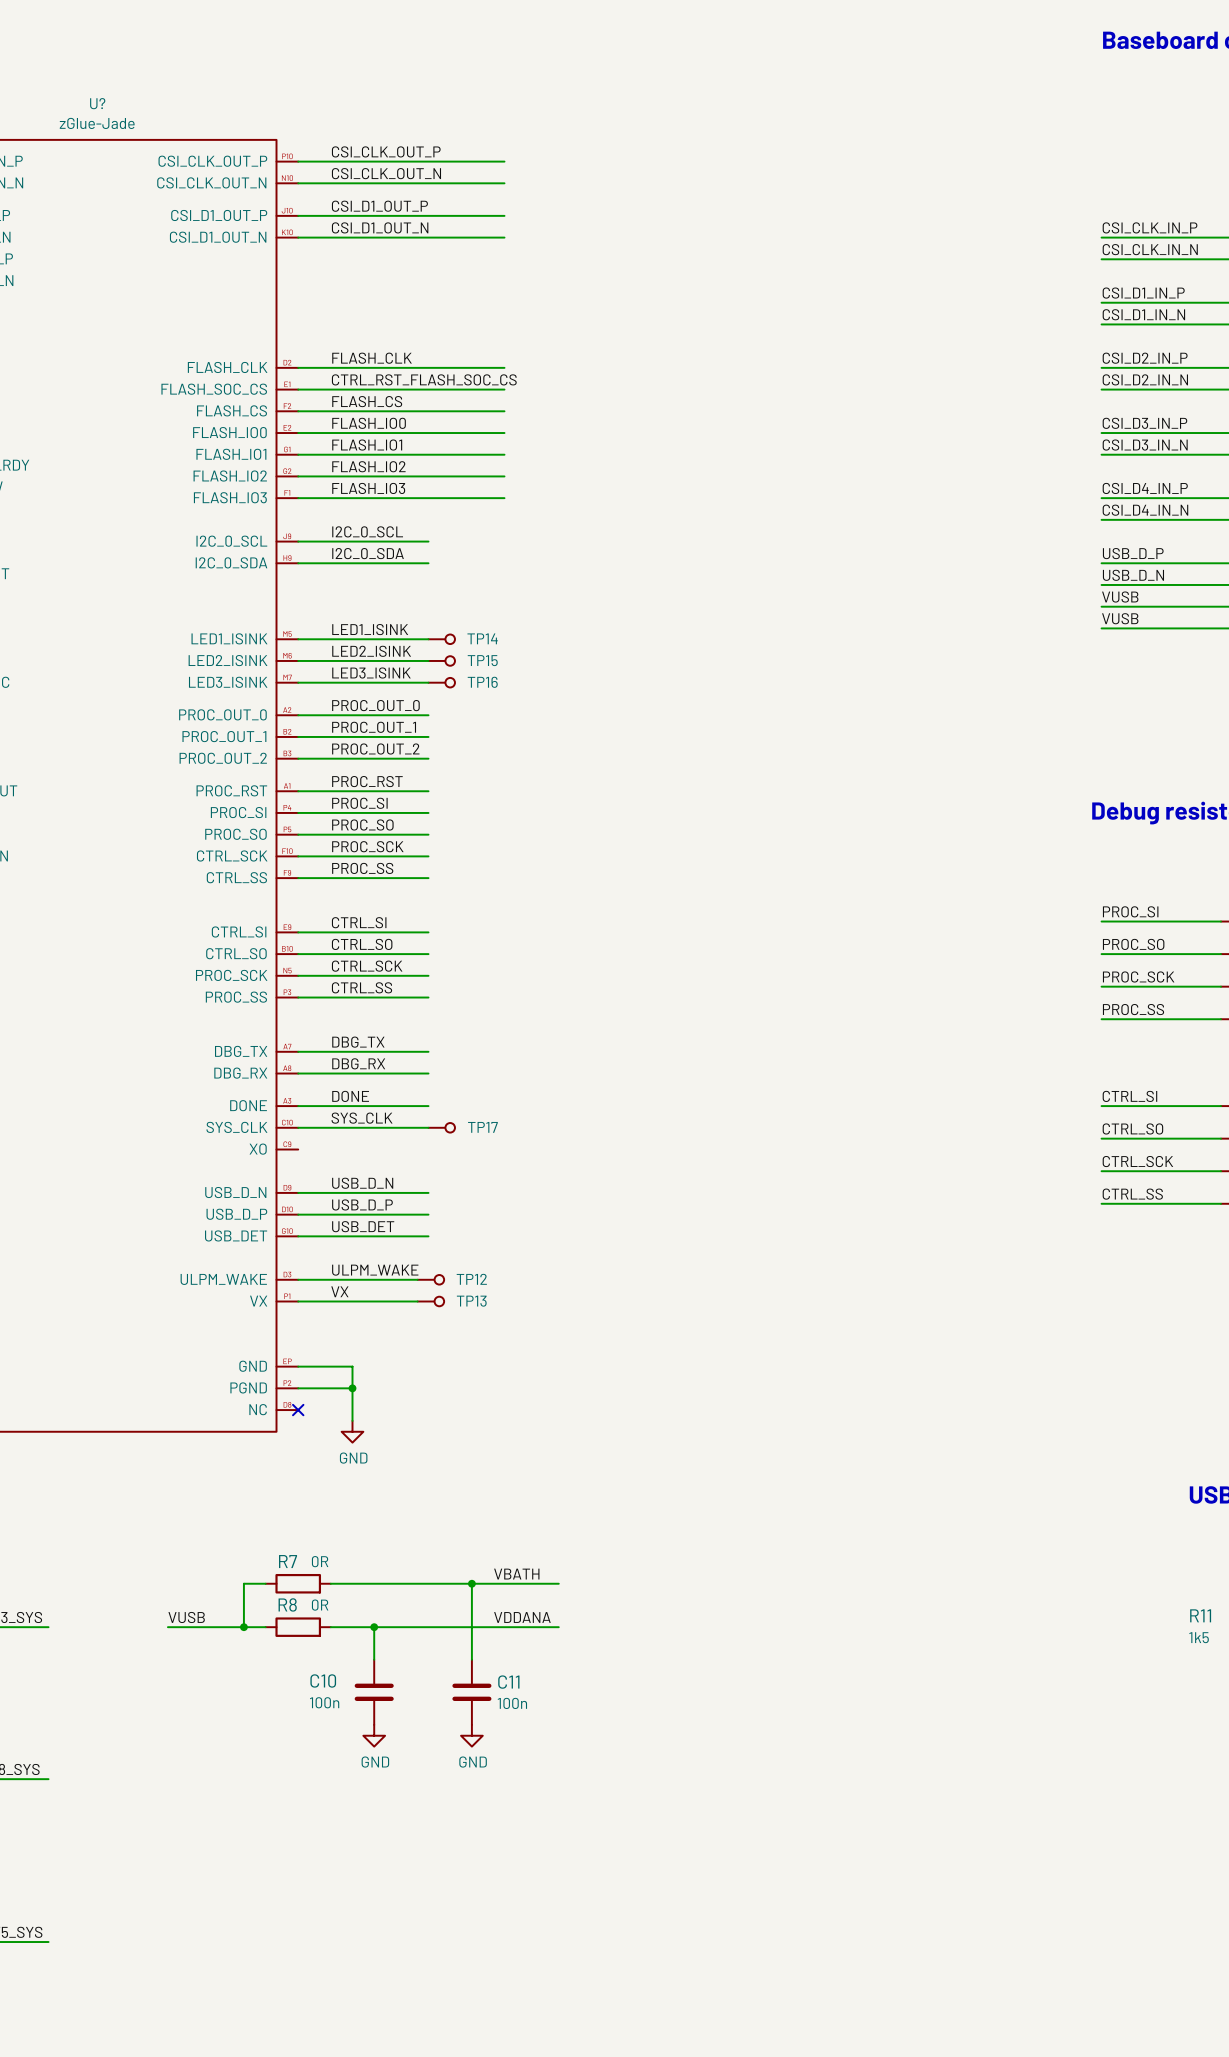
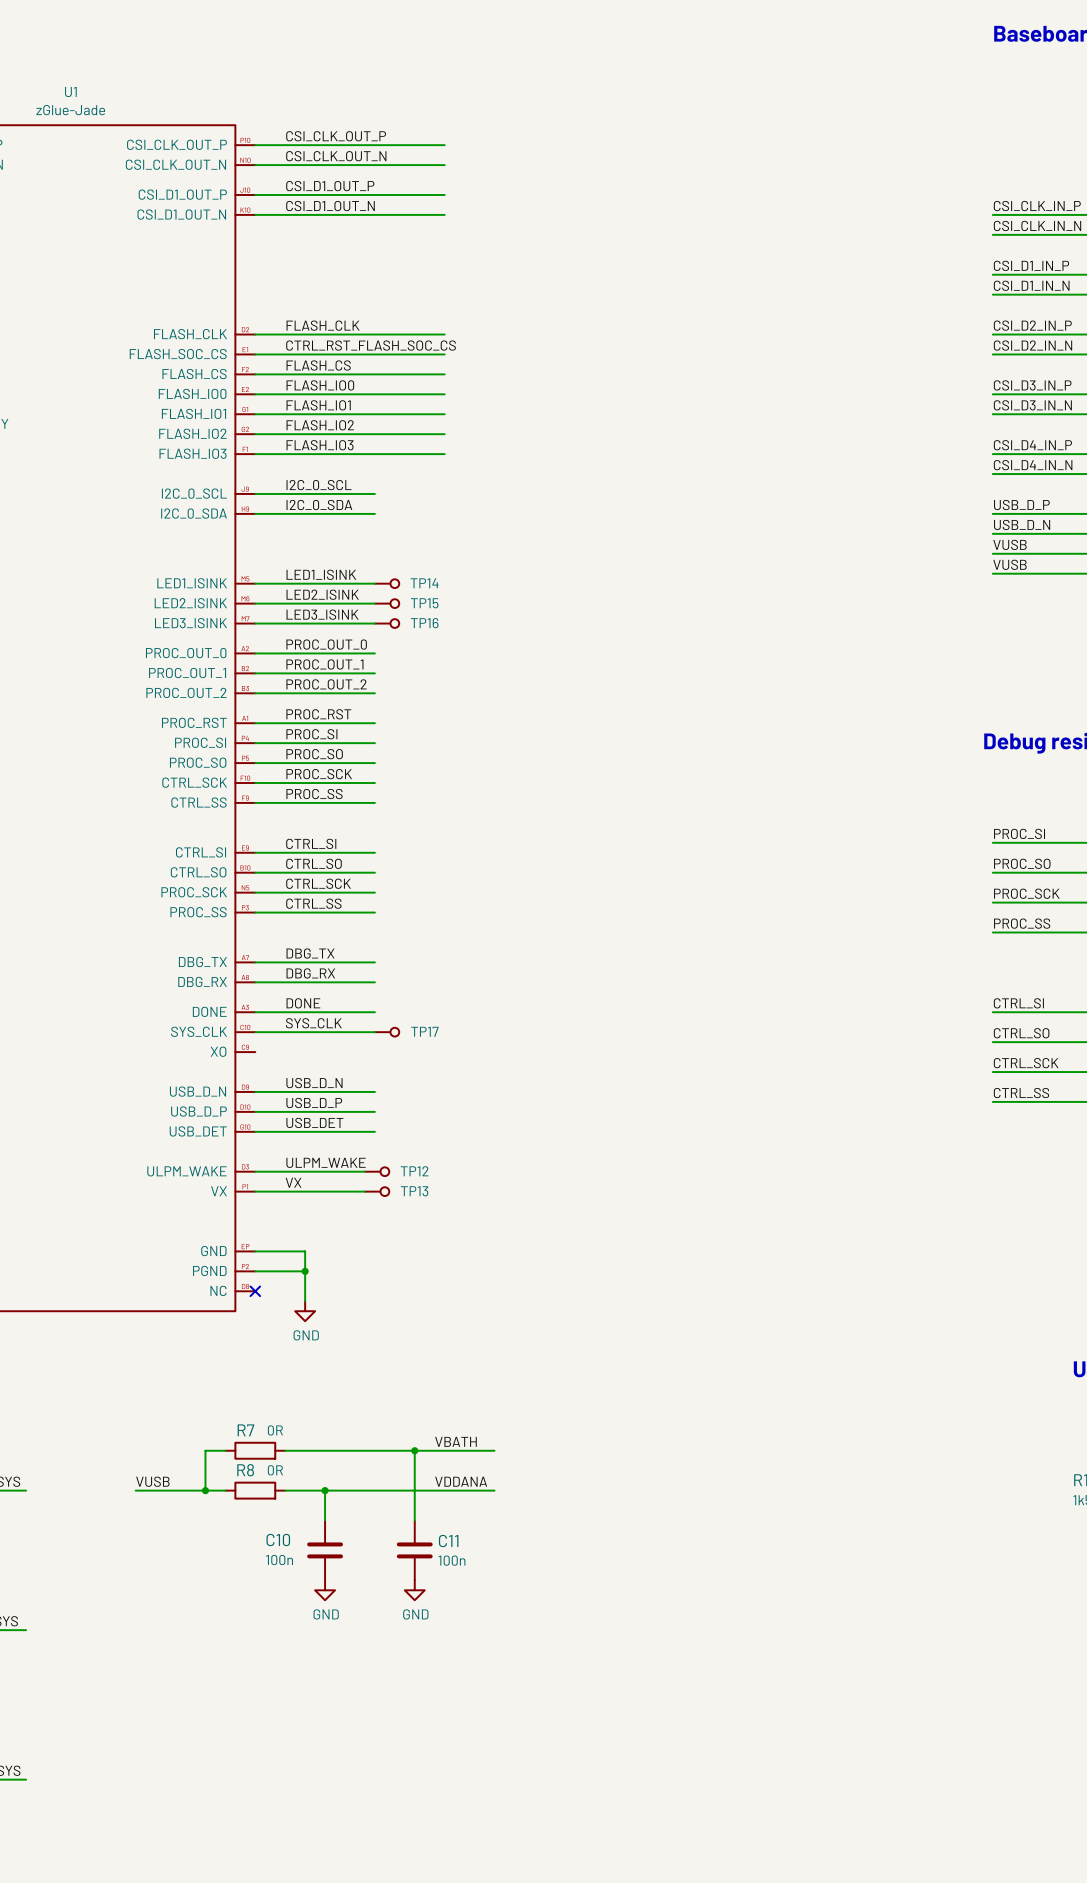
U? name: U? (97, 103) -> U1 (70, 92)

